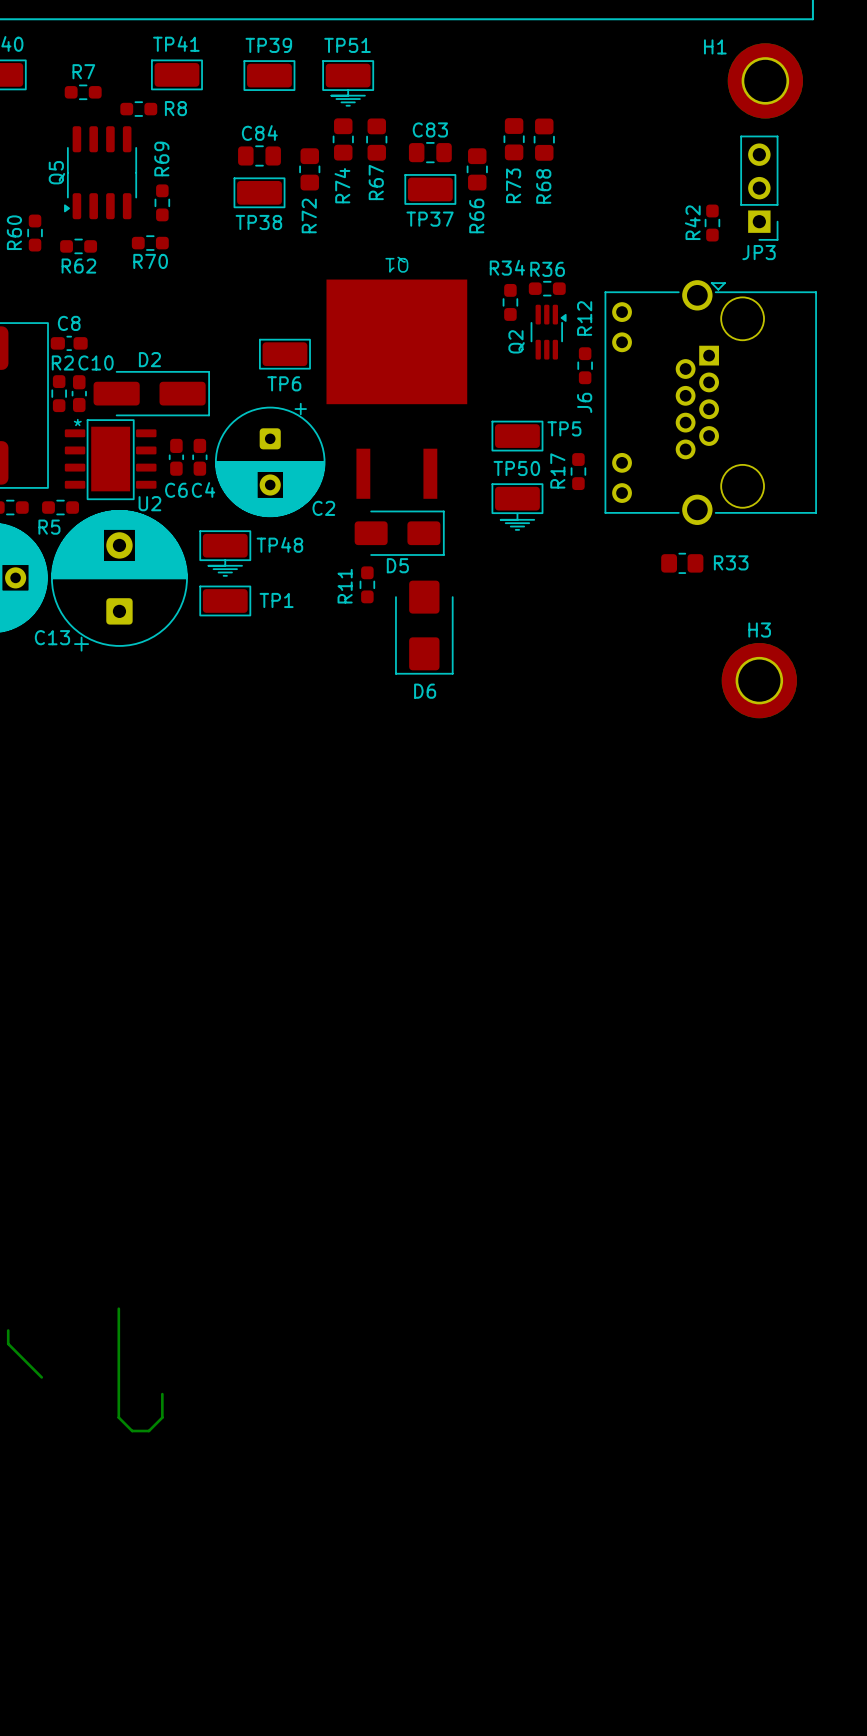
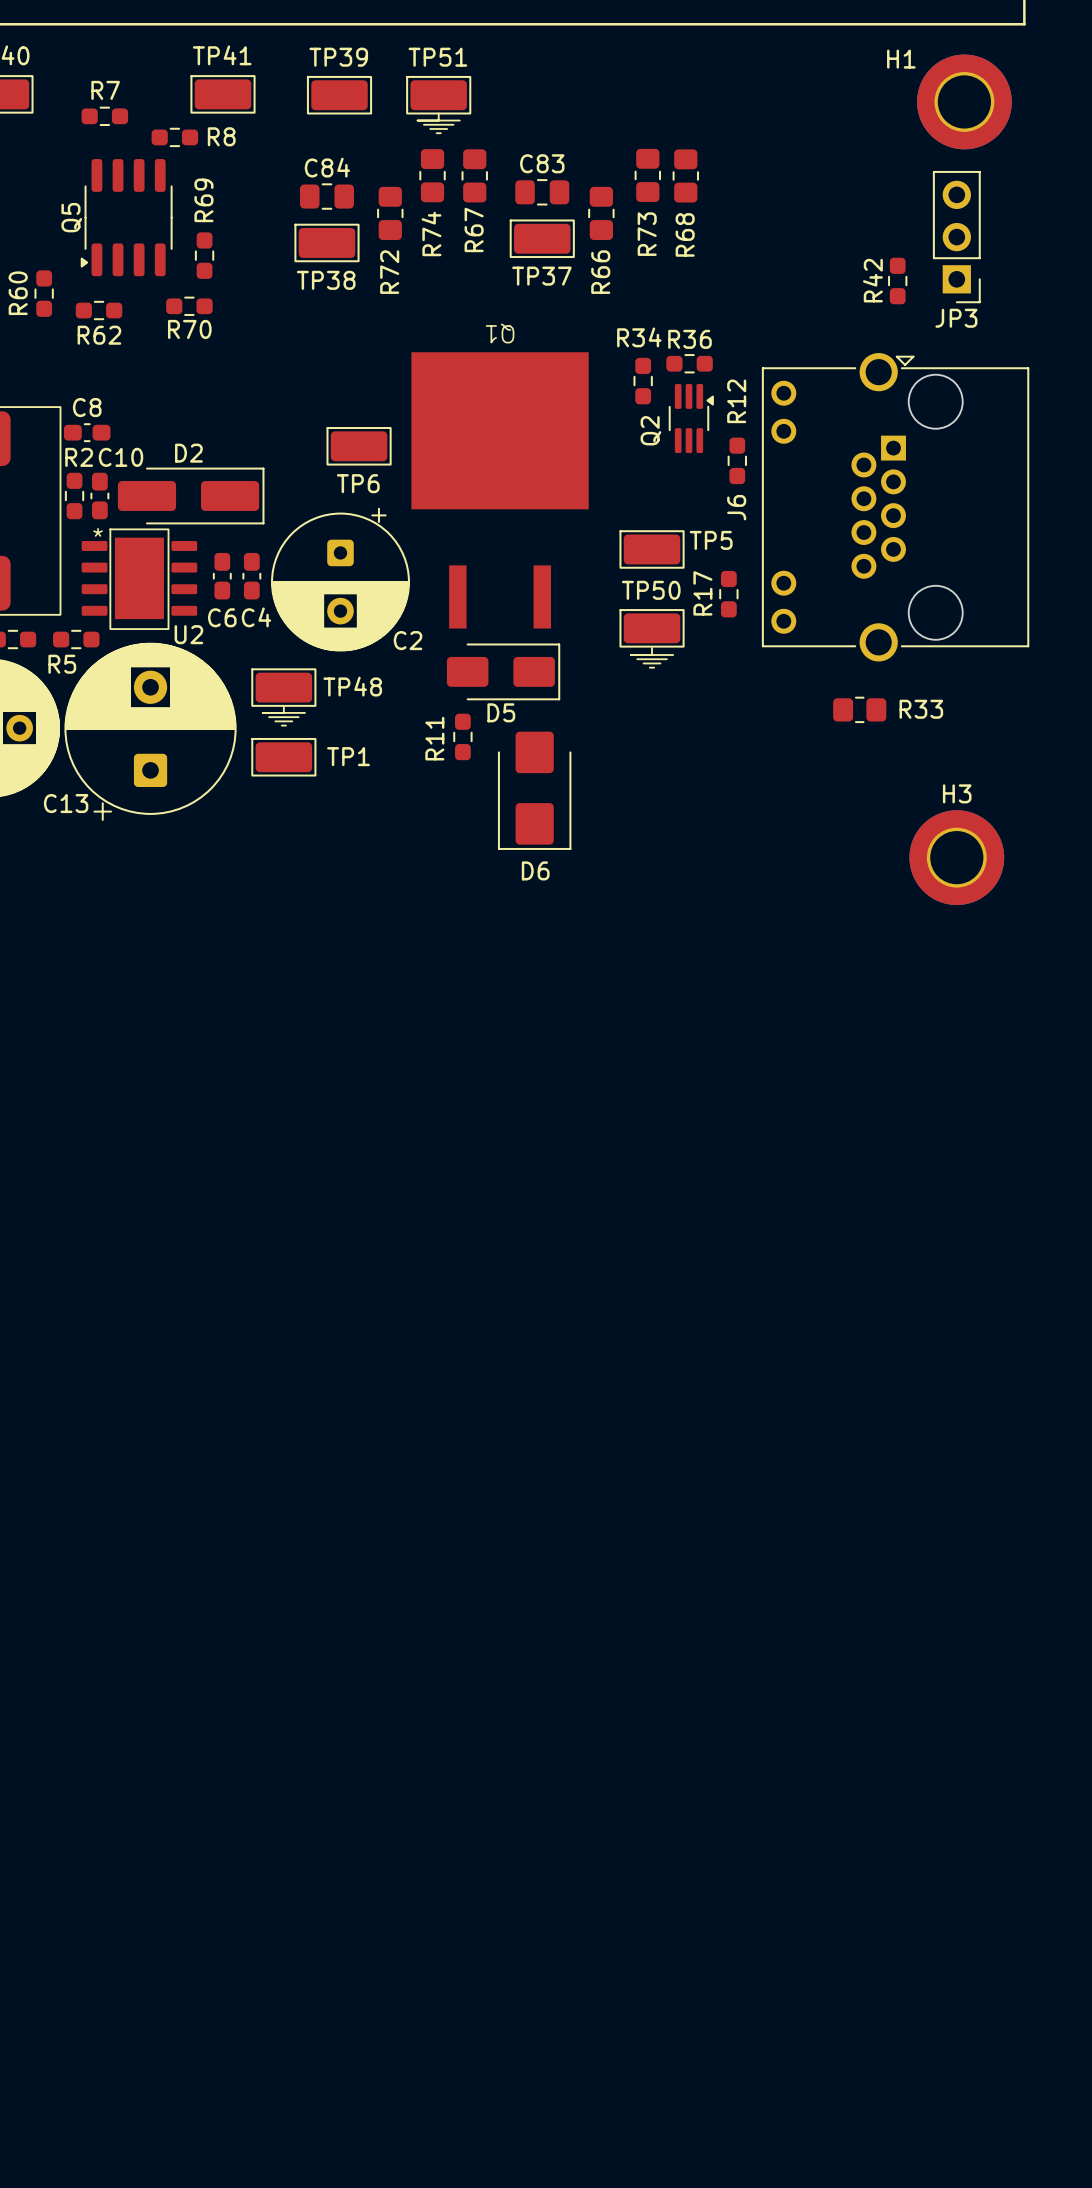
bottom track: (118, 1308) (118, 1417) (132, 1431) (148, 1431) (162, 1417) (162, 1394) -> none
bottom track: (8, 1330) (8, 1343) (41, 1377) -> none

